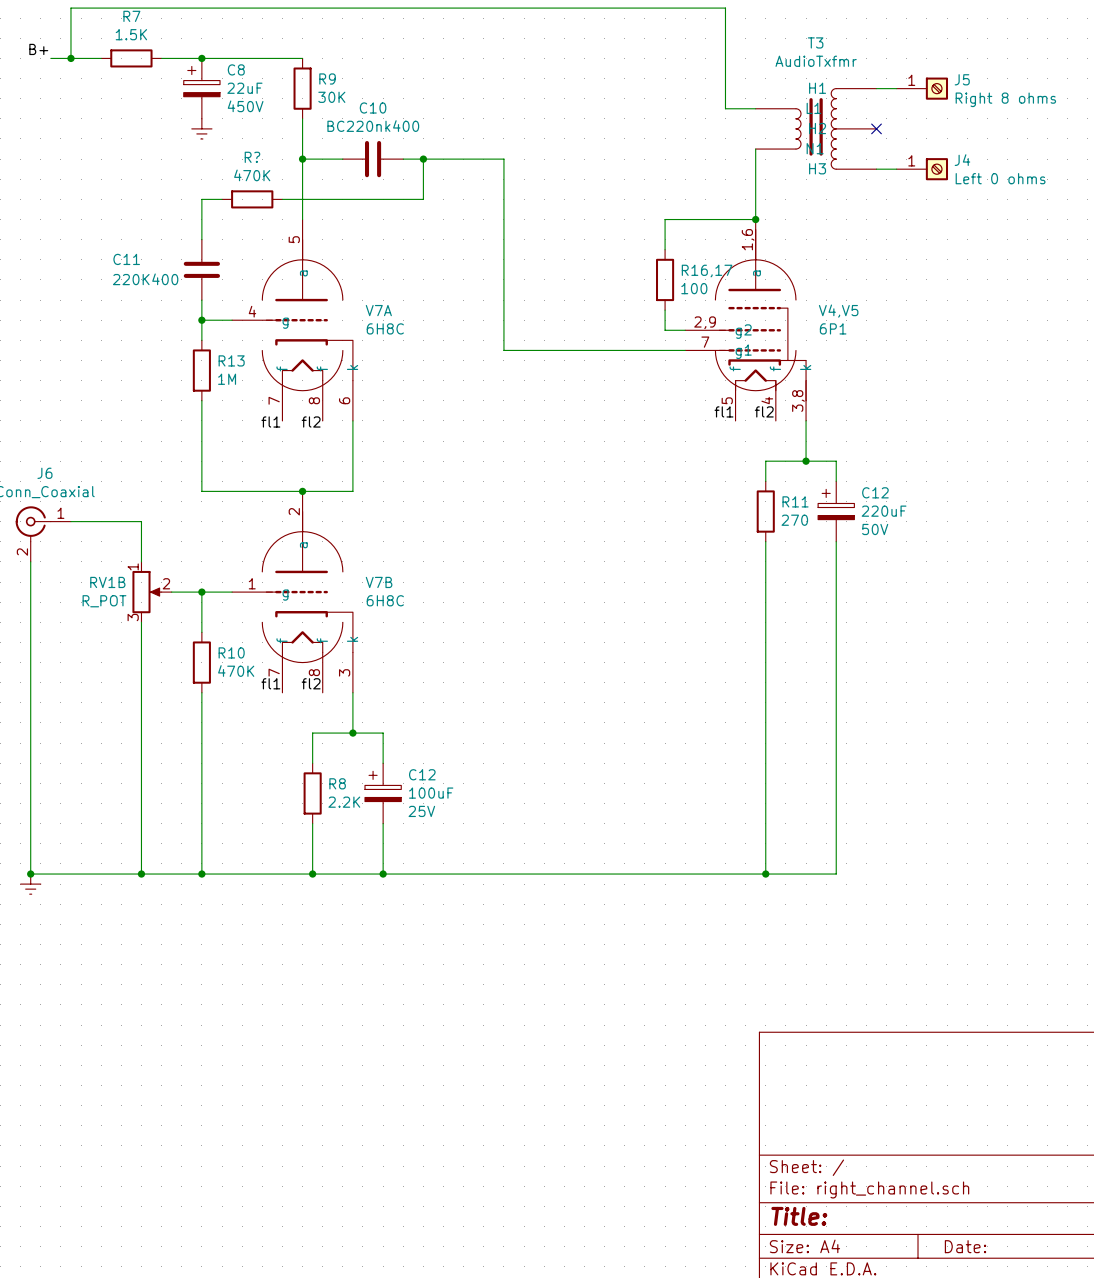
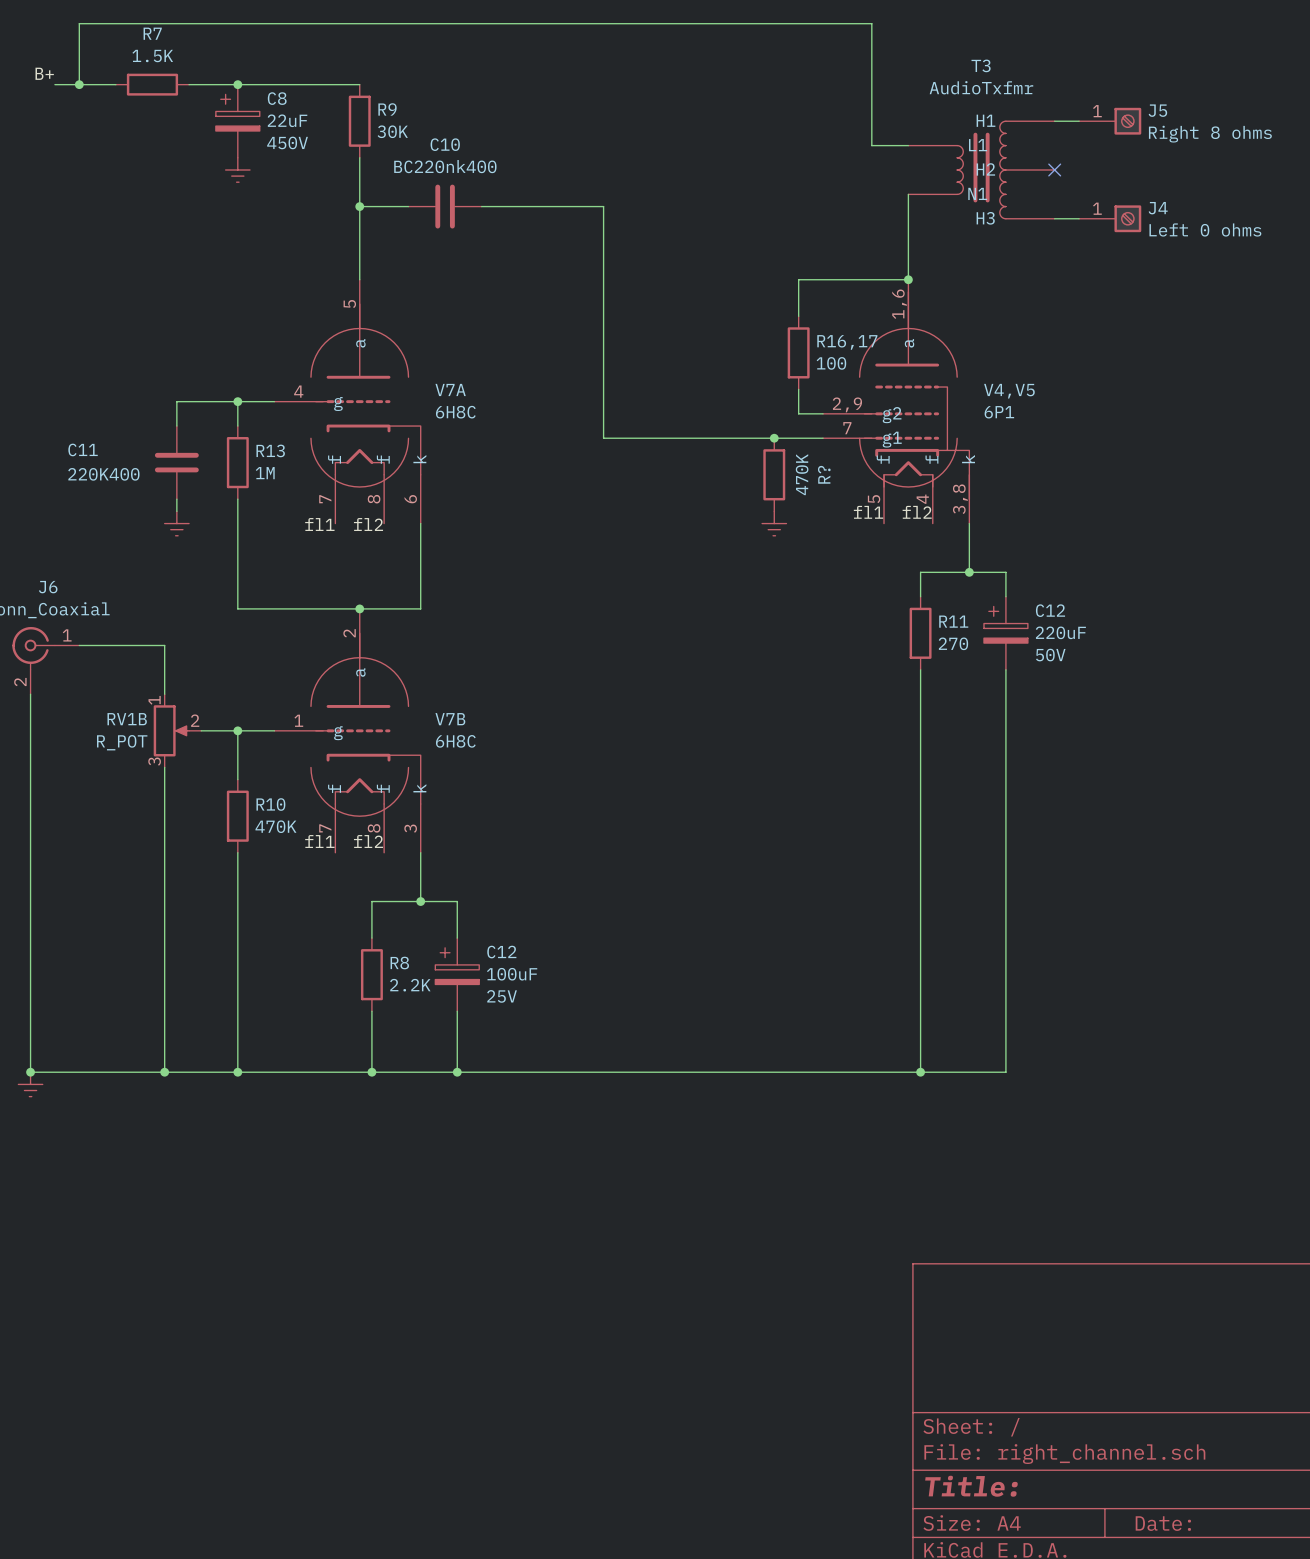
wire: (423, 159) (423, 199) (282, 199) -> none
junction: (423, 159) -> none
wire: (222, 199) (201, 199) (201, 239) -> none
R?: 470K (252, 199) -> none
C11 position: (201, 269) -> (176, 462)
wire: (201, 300) (201, 320) -> (176, 426) (176, 401) (237, 401)
junction: none -> (774, 438)
R?: none -> 470K (774, 474)
wire: none -> (176, 499) (176, 511)
power symbol: none -> (176, 523)
power symbol: none -> (774, 523)

